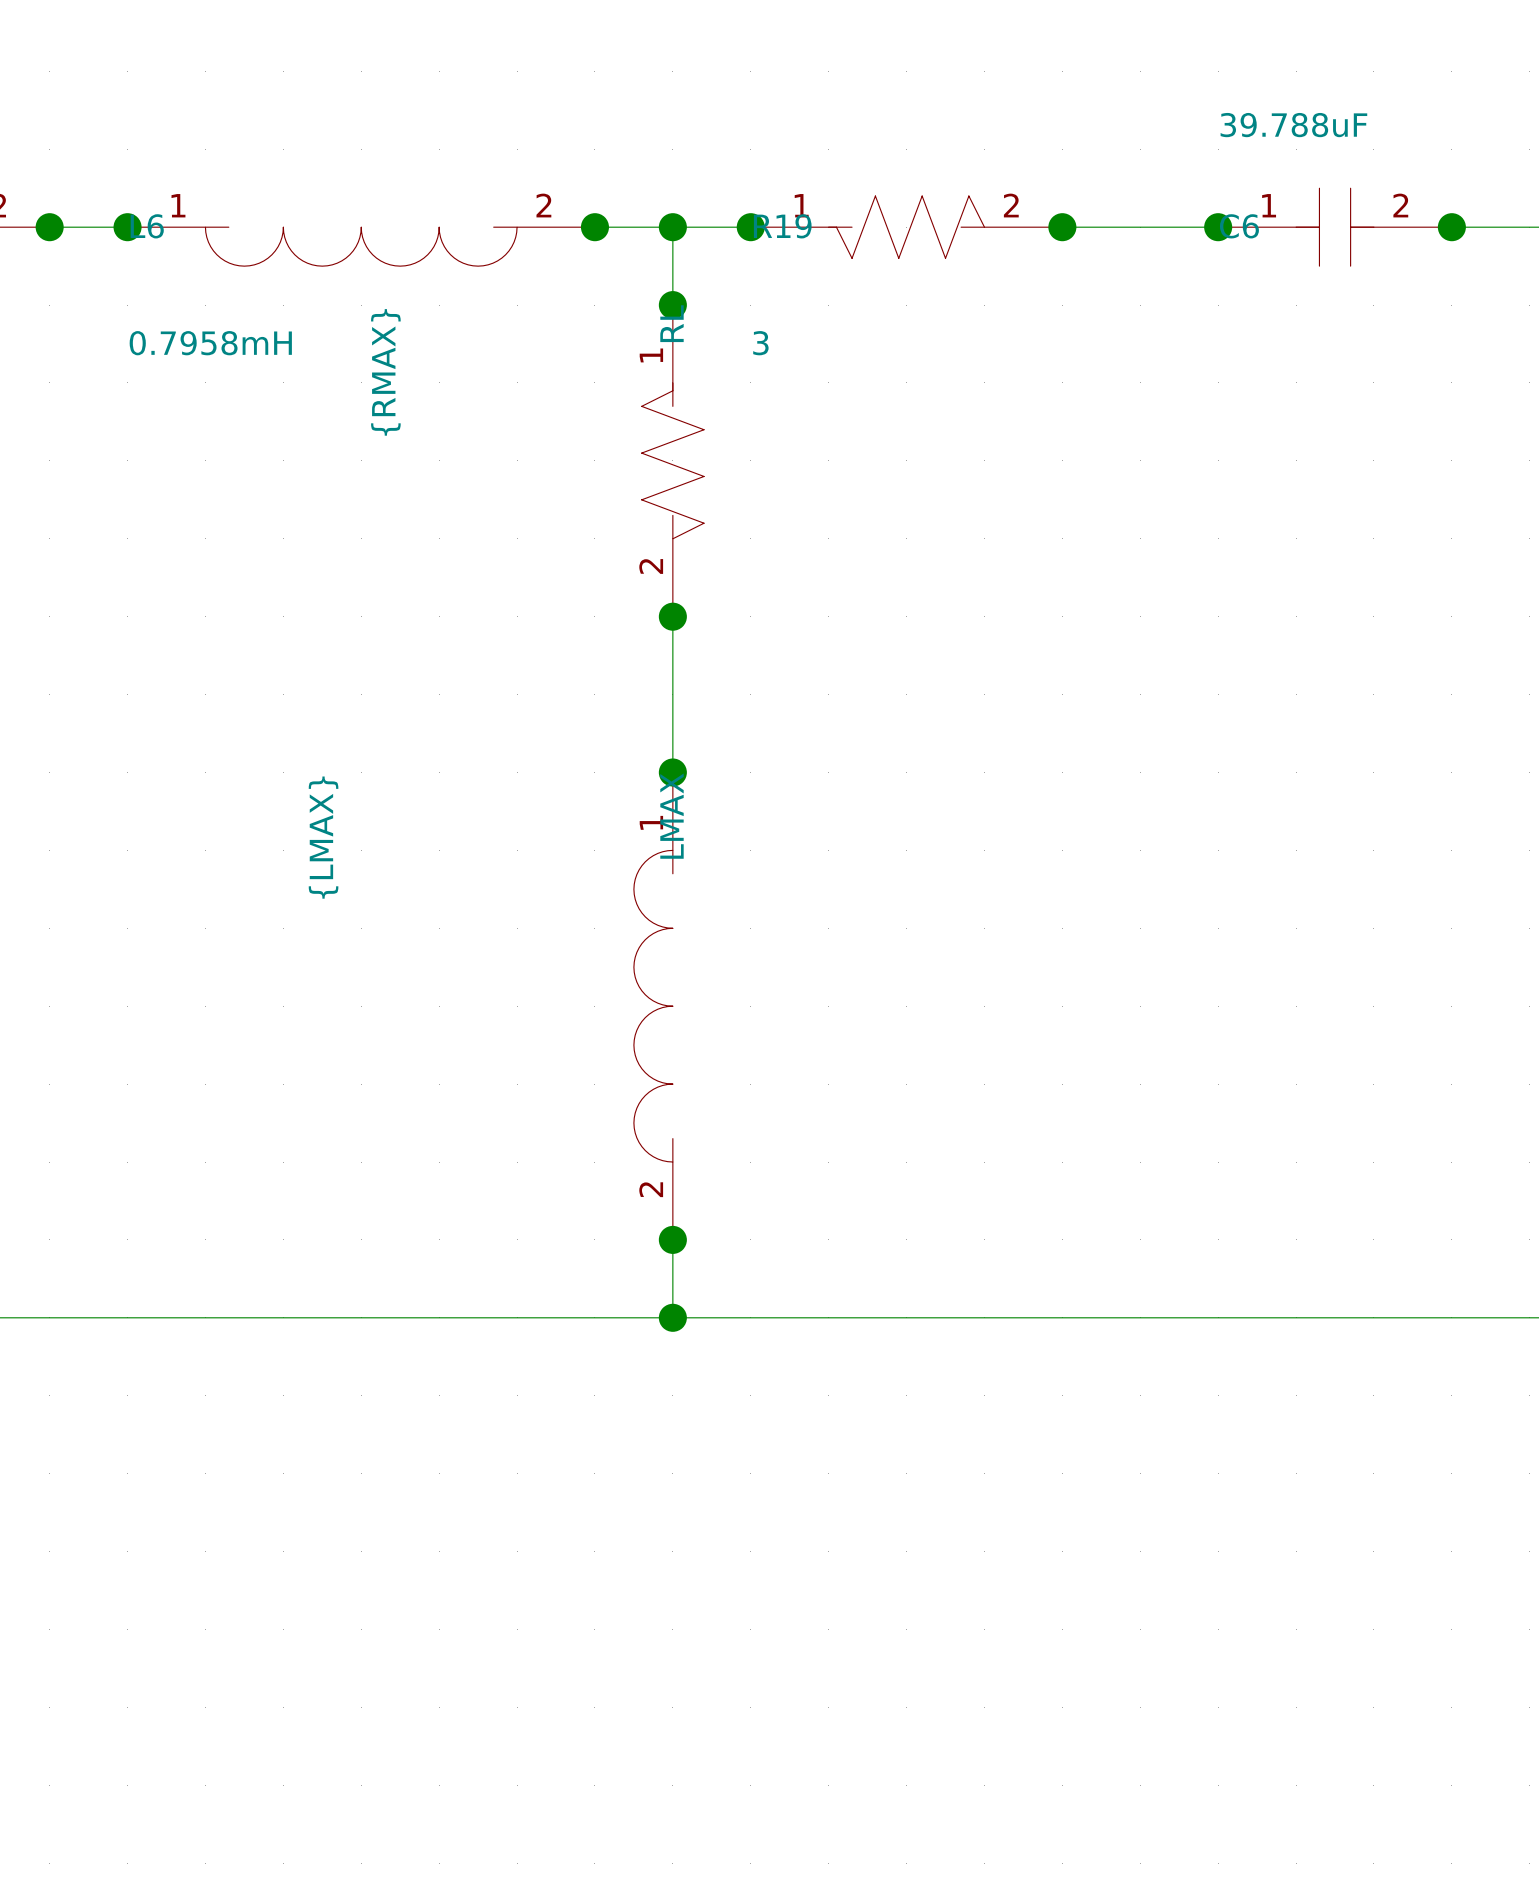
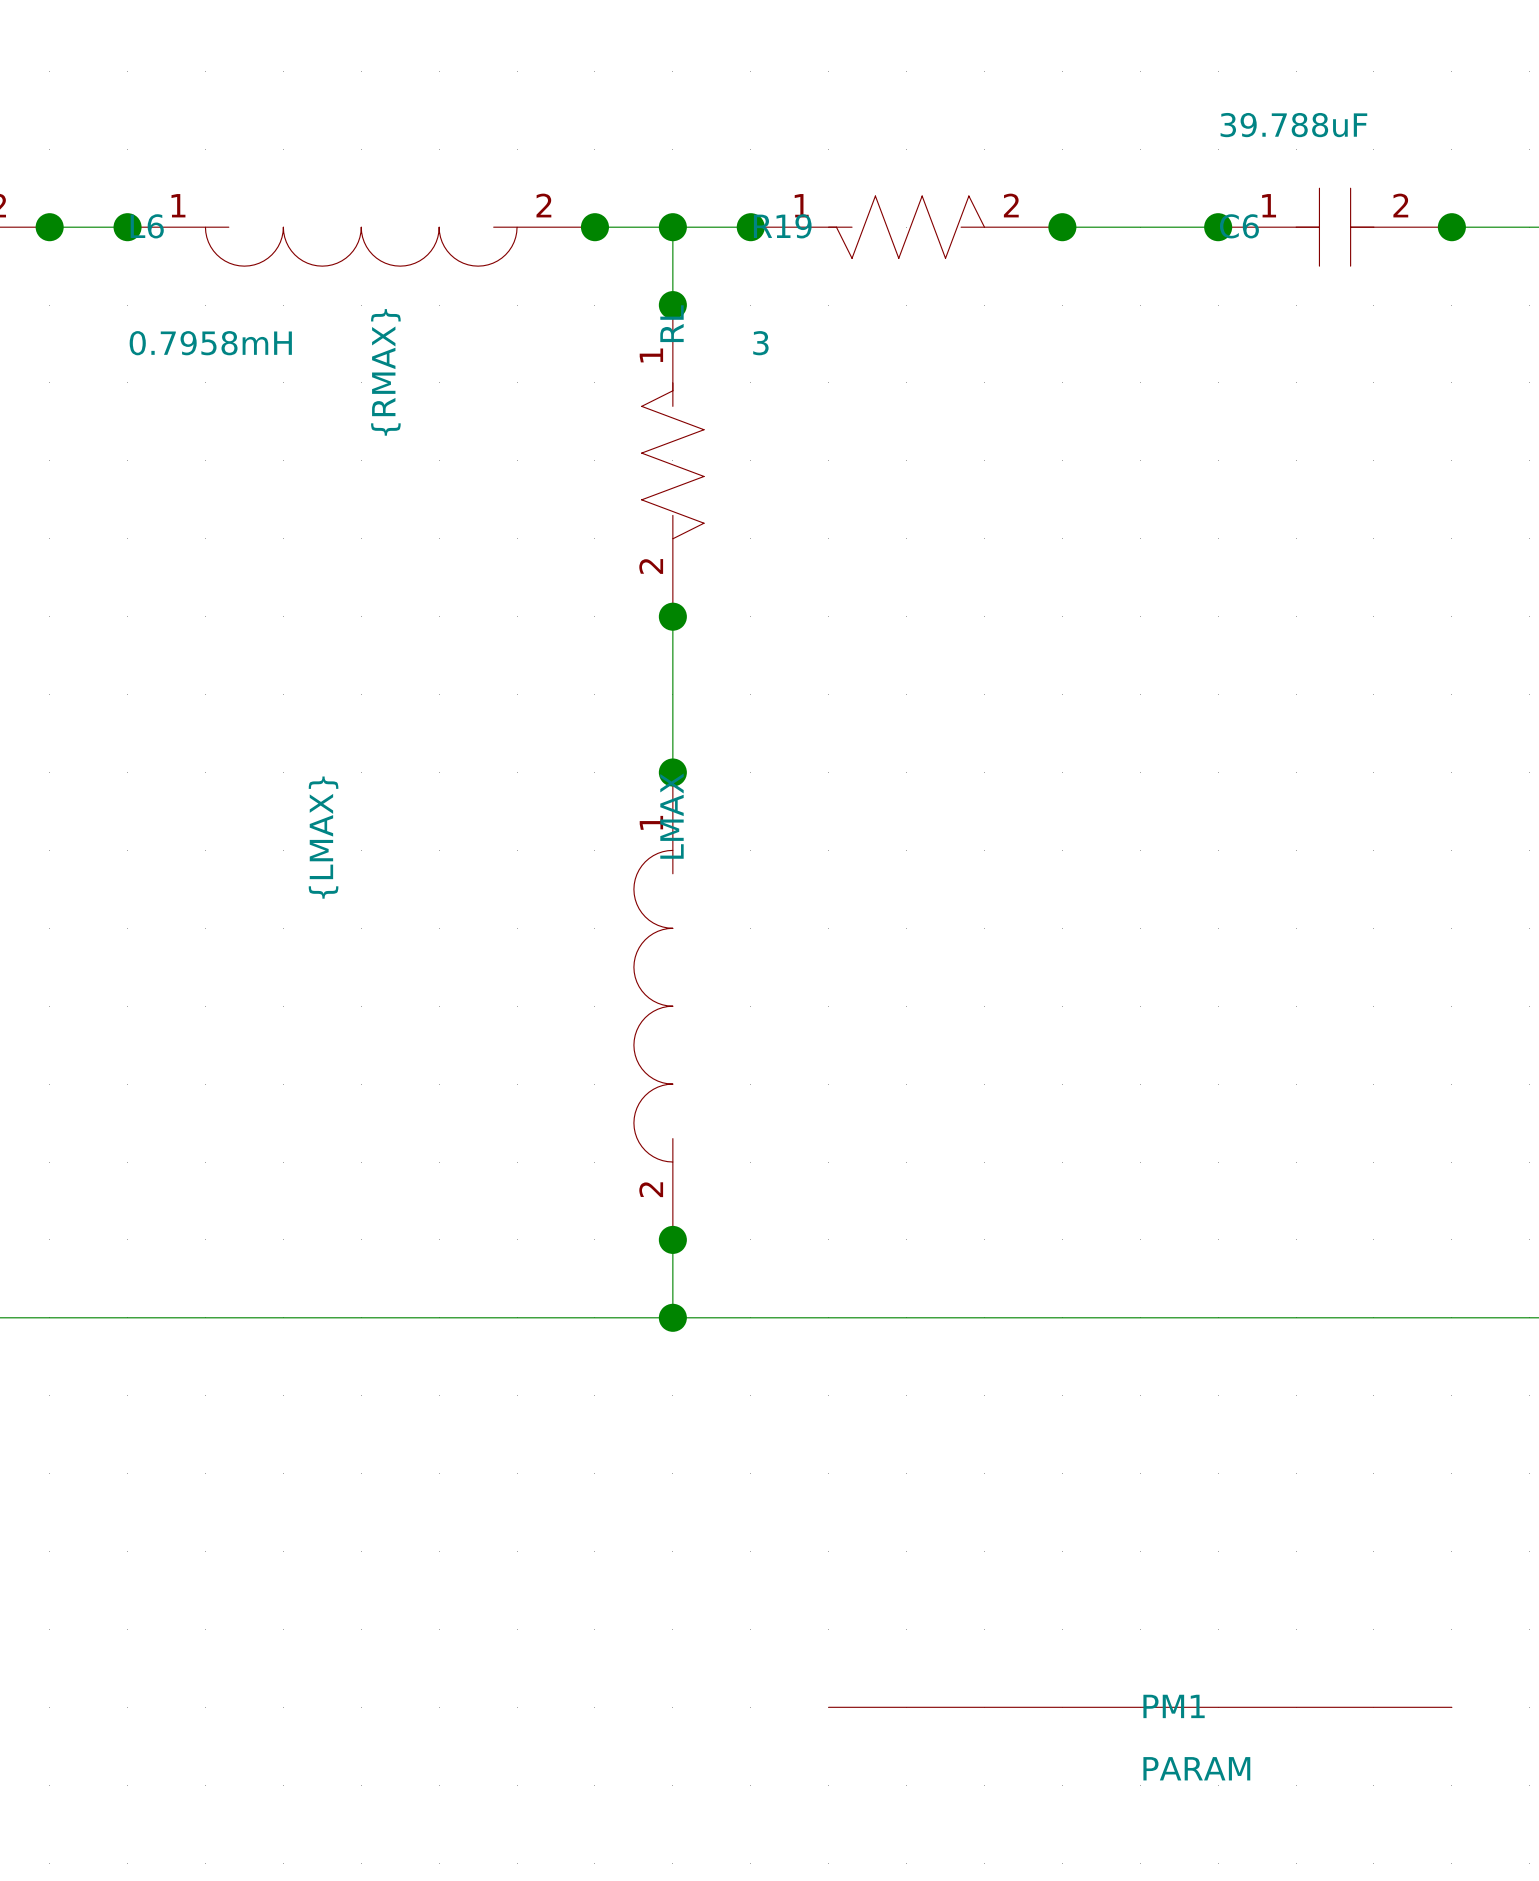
PM1: none -> PARAM (1140, 1707)

